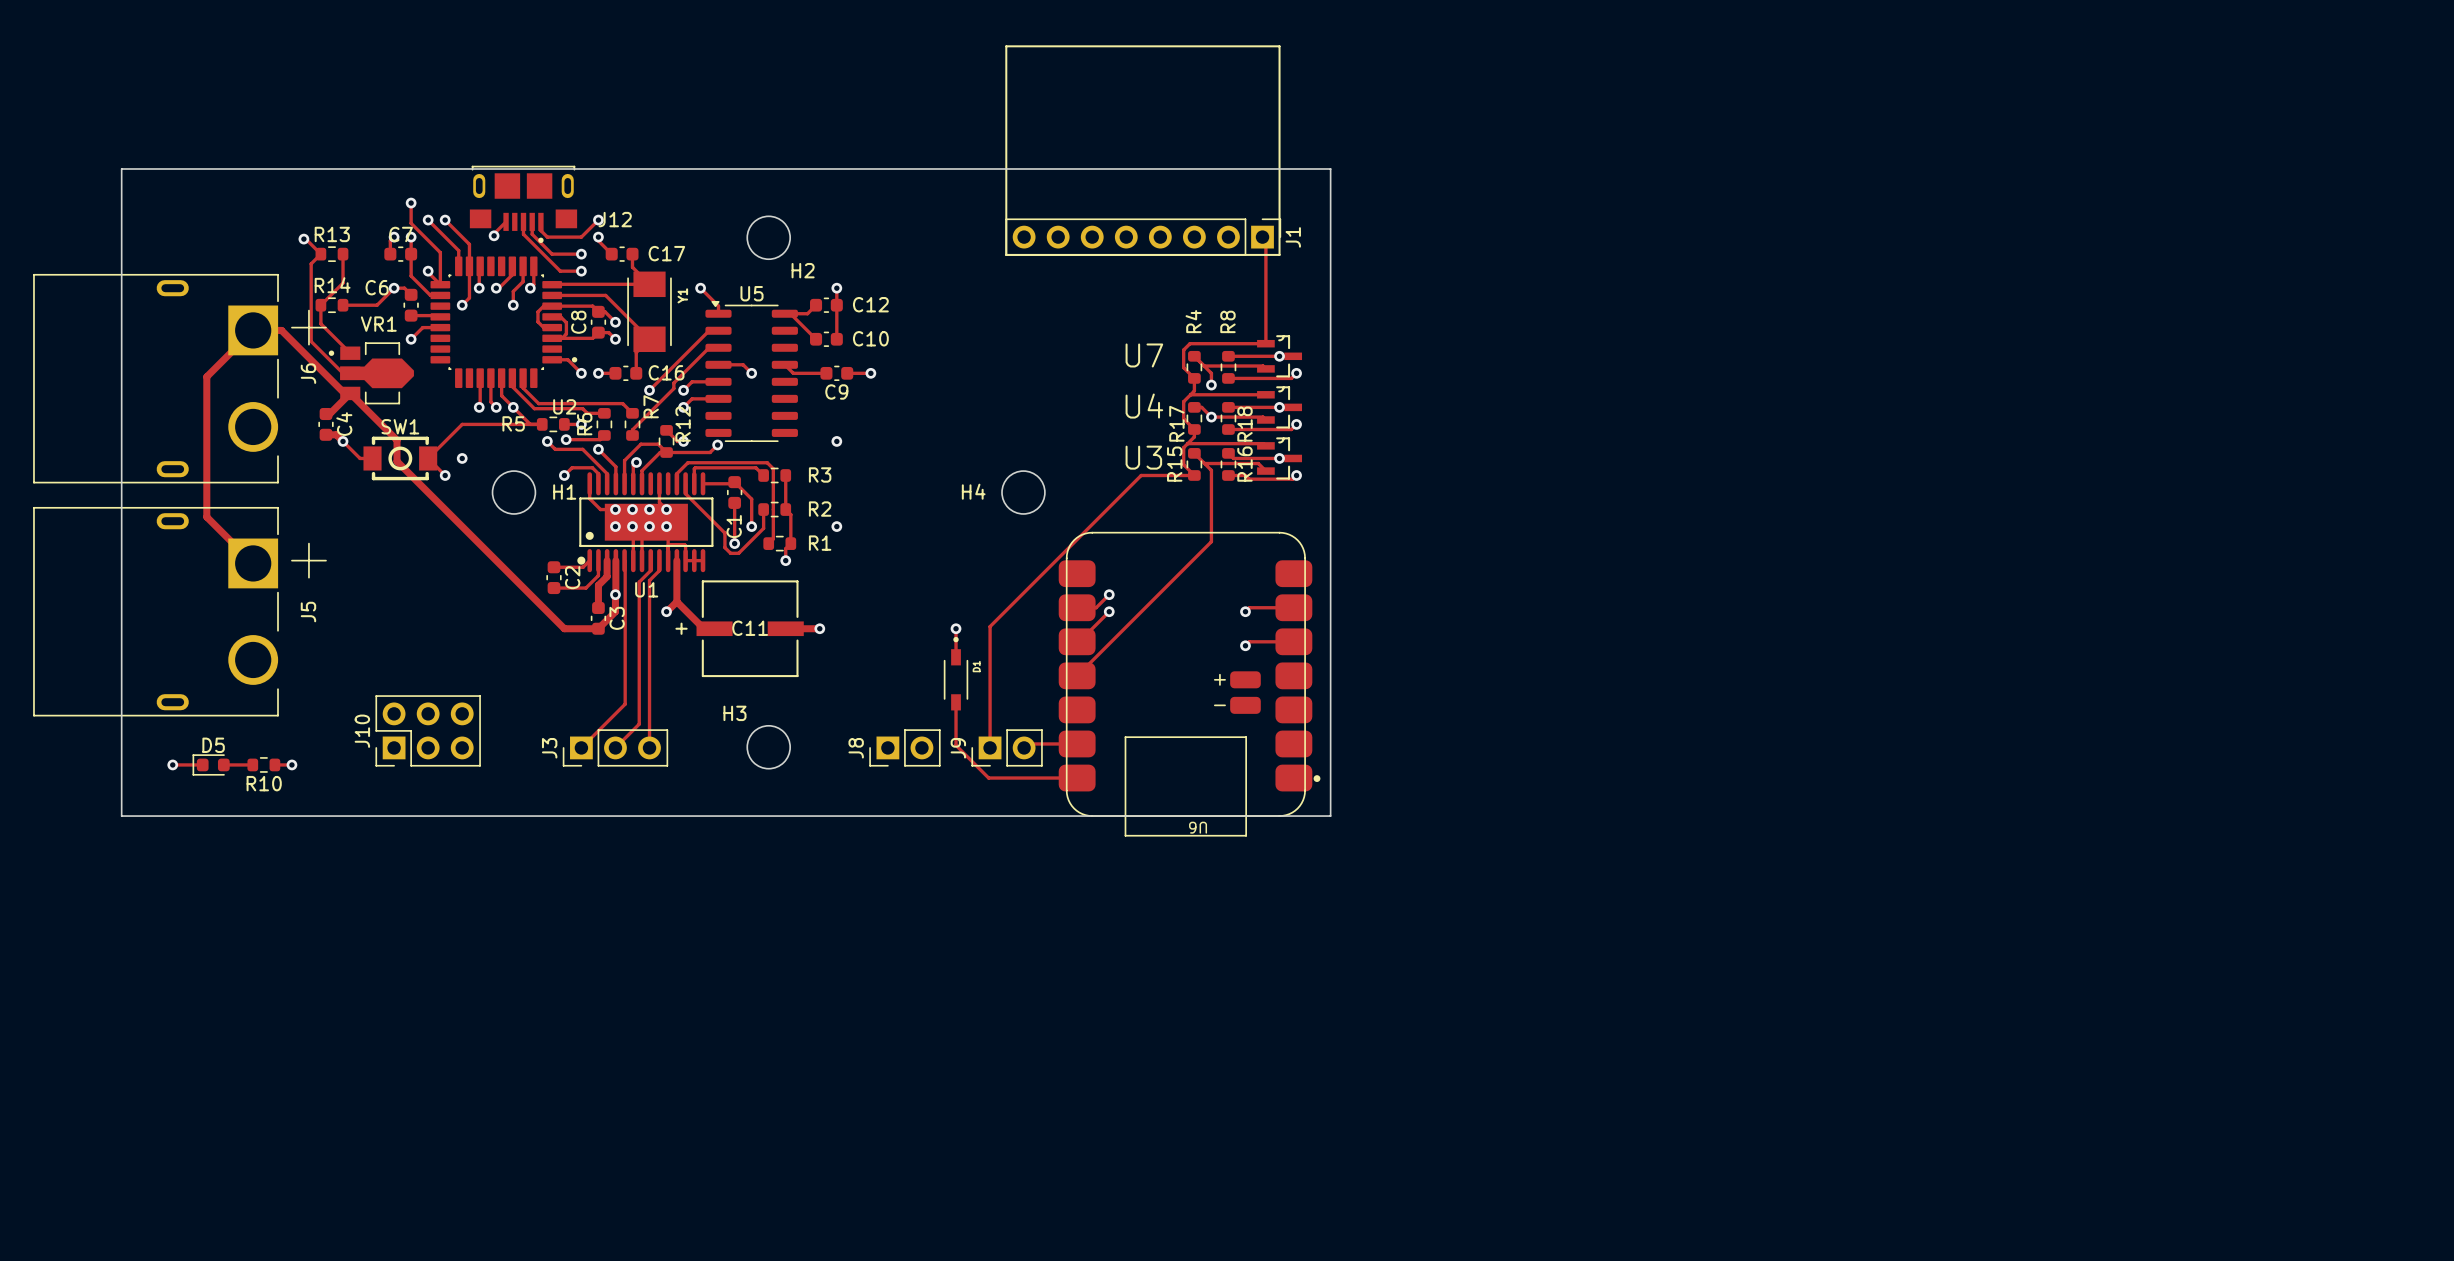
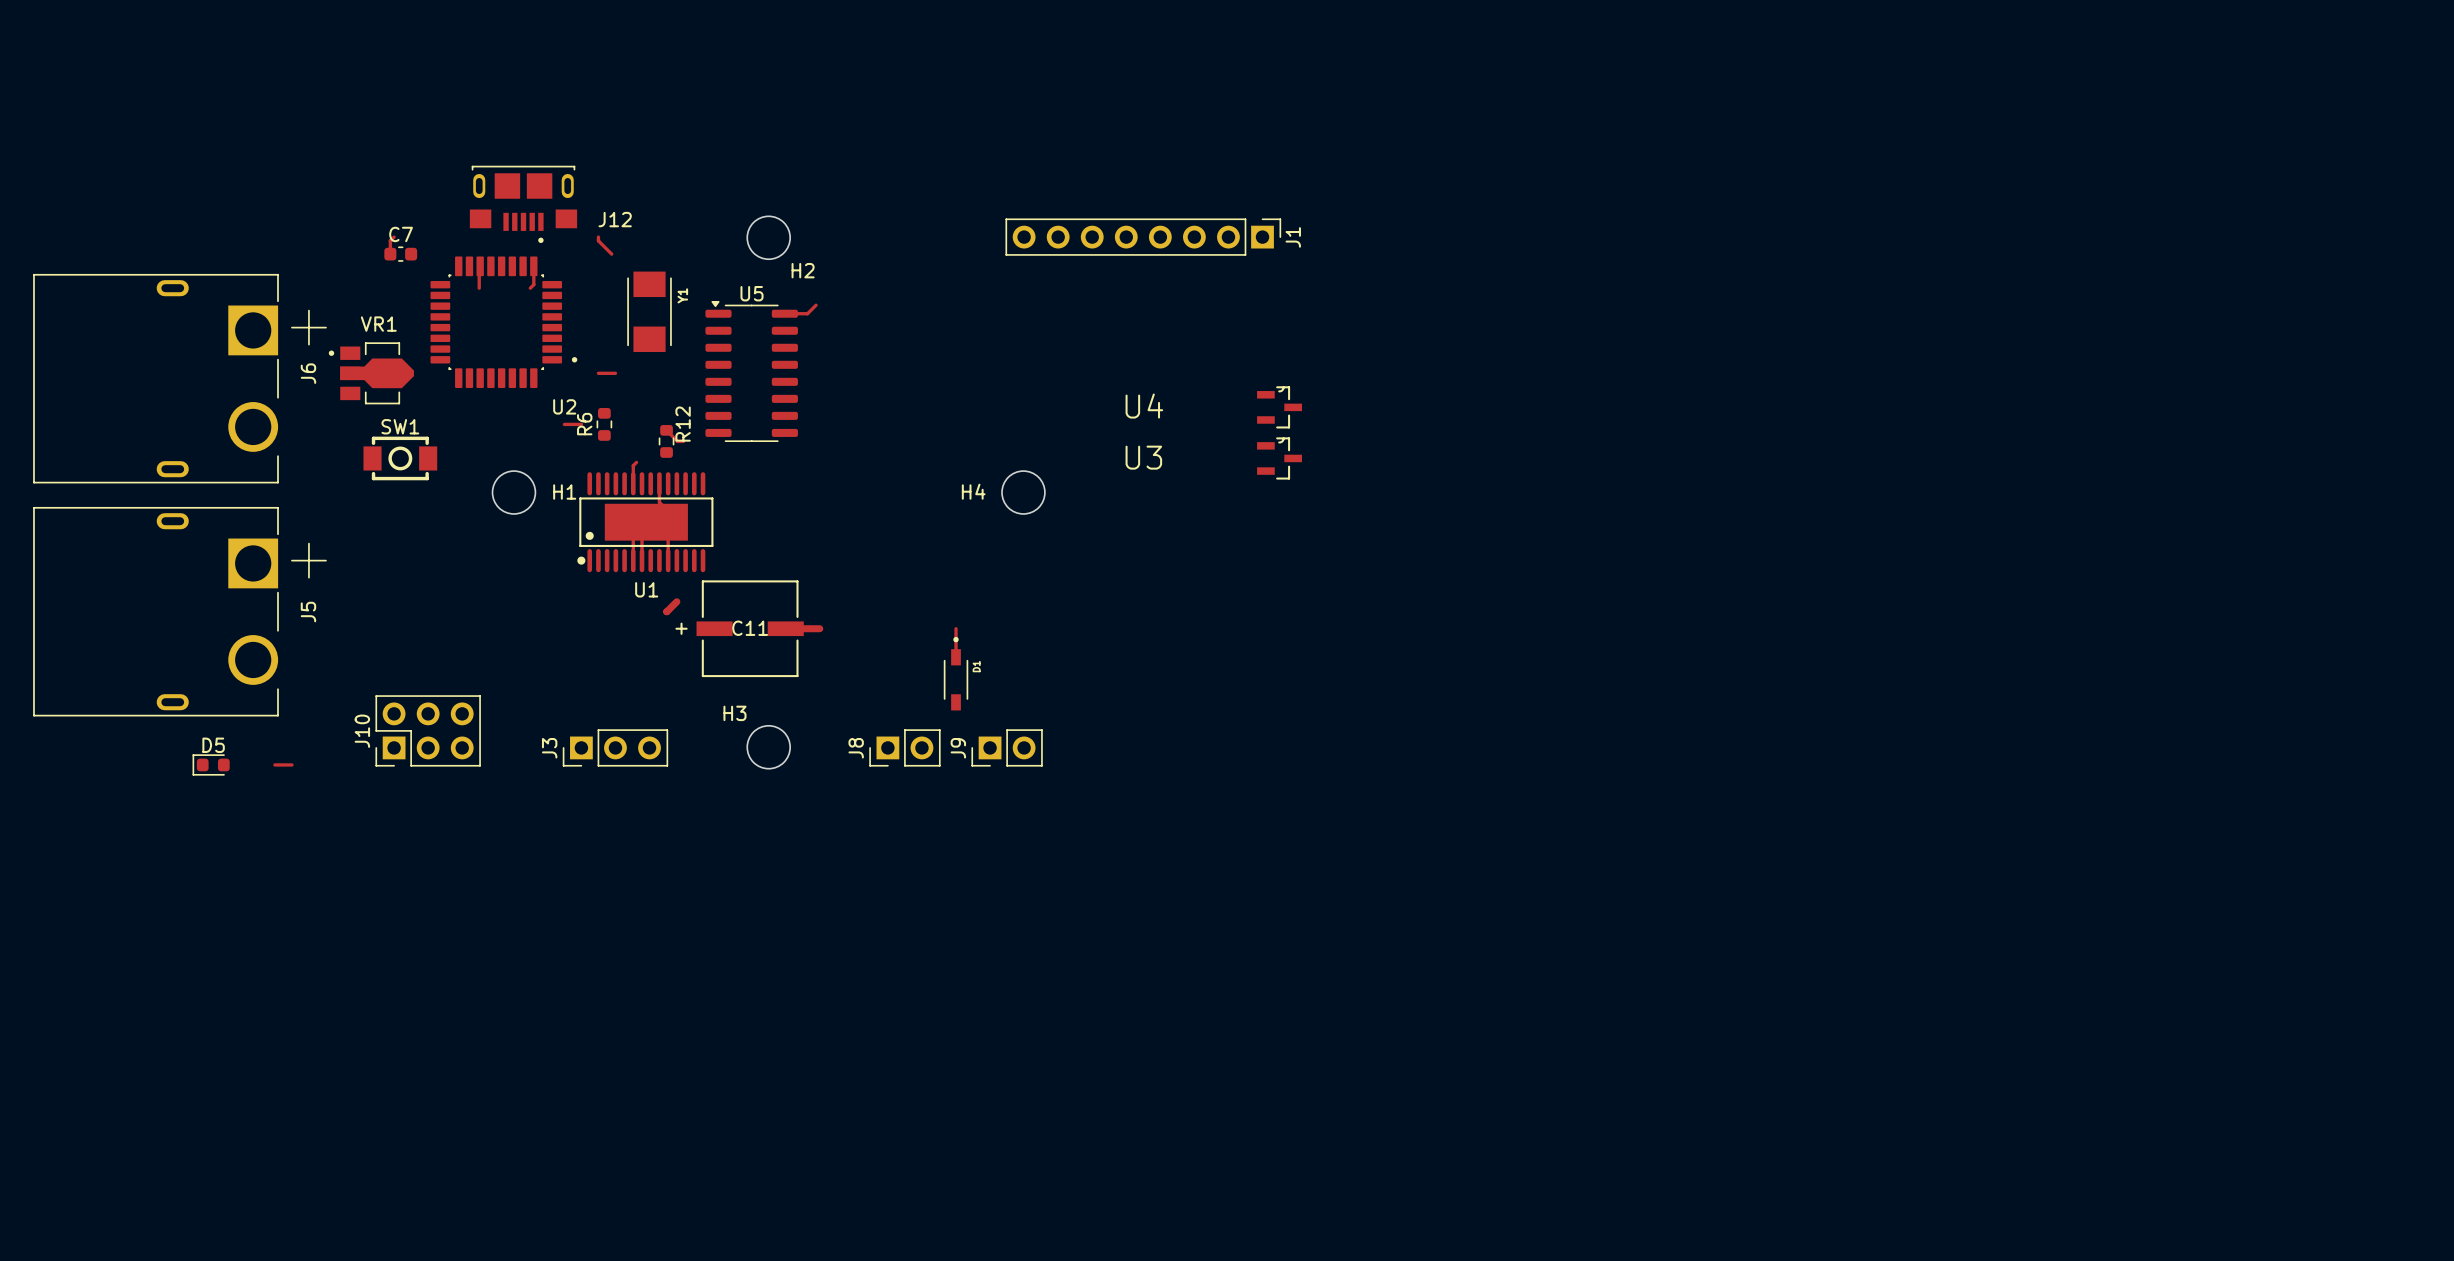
line: (1006, 46) (1279, 46) (1279, 254) (1006, 254) (1006, 46) -> none
board edge: (121, 168) (1330, 168) (1330, 816) (121, 816) (121, 168) -> none
track: (411, 203) (411, 223) (440, 252) (440, 284) (428, 271) -> none
via: (411, 203) -> none
track: (428, 220) (458, 250) (458, 266) -> none
via: (428, 220) -> none
track: (445, 220) (469, 244) (469, 297) (462, 305) -> none
via: (445, 220) -> none
track: (598, 220) (581, 237) (547, 237) (540, 230) (540, 221) -> none
via: (598, 220) -> none
track: (506, 221) (494, 235) -> none
track: (523, 221) (523, 234) (560, 271) (581, 271) -> none
track: (532, 221) (532, 234) (552, 254) (581, 254) -> none
via: (494, 235) -> none
via: (394, 237) -> none
track: (411, 237) (411, 276) (430, 295) (440, 295) -> none
via: (411, 237) -> none
via: (598, 237) -> none
track: (1262, 237) (1265, 240) (1265, 343) (1189, 343) (1183, 349) (1183, 367) (1194, 378) (1194, 390) (1183, 401) (1183, 418) (1194, 429) (1194, 436) (1183, 447) (1183, 464) (1194, 475) (1141, 475) (990, 626) (990, 747) -> none
track: (303, 239) (320, 254) (311, 263) (311, 341) (343, 373) (350, 373) -> none
via: (303, 239) -> none
R13: (331, 254) -> none
track: (343, 254) (343, 283) (320, 305) (320, 323) (350, 353) -> none
via: (581, 254) -> none
C17: (622, 254) -> none
track: (632, 254) (632, 267) (649, 284) (552, 284) -> none
track: (512, 266) (512, 274) (498, 288) (496, 288) -> none
track: (523, 266) (523, 281) (513, 291) (513, 305) -> none
via: (428, 271) -> none
via: (581, 271) -> none
via: (394, 288) -> none
via: (479, 288) -> none
via: (496, 288) -> none
via: (530, 288) -> none
track: (700, 288) (718, 306) (718, 313) -> none
via: (700, 288) -> none
track: (836, 288) (836, 339) -> none
via: (836, 288) -> none
track: (411, 294) (404, 288) (394, 288) (377, 305) (343, 305) -> none
track: (552, 295) (605, 295) (649, 339) (636, 352) (636, 373) -> none
R14: (331, 305) -> none
C6: (411, 305) -> none
via: (462, 305) -> none
via: (513, 305) -> none
C12: (826, 305) -> none
track: (790, 313) (816, 339) -> none
track: (411, 315) (440, 316) -> none
track: (552, 316) (560, 316) (566, 322) (566, 333) (562, 338) -> none
C8: (598, 322) -> none
track: (615, 322) (605, 311) (598, 311) (592, 306) (543, 306) (537, 311) (537, 321) (543, 327) (552, 327) -> none
via: (615, 322) -> none
track: (440, 327) (422, 327) (411, 339) -> none
track: (718, 330) (709, 330) (649, 390) -> none
track: (552, 338) (592, 338) (598, 332) (608, 332) (615, 339) -> none
via: (411, 339) -> none
via: (615, 339) -> none
C10: (826, 339) -> none
track: (718, 347) (709, 347) (673, 383) (673, 388) (632, 429) (632, 435) -> none
track: (1194, 356) (1211, 373) (1211, 385) -> none
track: (1228, 356) (1293, 356) -> none
U7: (1279, 356) -> none
via: (1279, 356) -> none
track: (552, 359) (567, 359) (581, 373) -> none
track: (718, 364) (743, 364) (751, 373) -> none
track: (784, 364) (793, 373) (826, 373) -> none
track: (1204, 366) (1263, 366) (1265, 368) -> none
R4: (1194, 367) -> none
R8: (1228, 367) -> none
via: (581, 373) -> none
via: (598, 373) -> none
C16: (625, 373) -> none
via: (751, 373) -> none
C9: (836, 373) -> none
track: (847, 373) (870, 373) -> none
via: (870, 373) -> none
track: (1296, 373) (1291, 378) (1228, 378) -> none
via: (1296, 373) -> none
track: (480, 378) (479, 407) -> none
track: (490, 378) (490, 402) (496, 407) -> none
track: (501, 378) (501, 395) (530, 424) -> none
track: (512, 378) (512, 386) (534, 408) (582, 408) (587, 413) (604, 413) -> none
track: (523, 378) (523, 388) (538, 403) (622, 403) (632, 413) -> none
track: (718, 381) (692, 381) (683, 390) -> none
via: (1211, 385) -> none
via: (649, 390) -> none
via: (683, 390) -> none
track: (345, 394) (281, 330) (253, 330) (206, 376) (206, 517) (253, 563) -> none
track: (1190, 394) (1265, 394) -> none
track: (718, 398) (692, 398) (683, 407) -> none
via: (479, 407) -> none
via: (496, 407) -> none
via: (513, 407) -> none
via: (683, 407) -> none
track: (1194, 407) (1201, 407) (1211, 417) (1263, 417) (1265, 419) -> none
track: (1228, 407) (1293, 407) -> none
via: (1279, 407) -> none
track: (325, 414) (329, 414) (350, 393) (397, 440) (397, 461) (564, 628) (598, 628) (615, 611) (615, 560) -> none
via: (1211, 417) -> none
R17: (1194, 418) -> none
R18: (1228, 418) -> none
C4: (325, 424) -> none
track: (542, 424) (462, 424) (428, 458) (445, 475) -> none
R5: (553, 424) -> none
via: (581, 424) -> none
R7: (632, 424) -> none
track: (1296, 424) (1291, 429) (1228, 429) -> none
via: (1296, 424) -> none
track: (325, 434) (336, 434) (360, 458) (372, 458) -> none
track: (604, 435) (600, 439) (566, 439) -> none
via: (566, 439) -> none
via: (343, 441) -> none
track: (547, 441) (555, 449) (582, 449) (607, 473) (607, 483) -> none
via: (547, 441) -> none
via: (683, 441) -> none
via: (836, 441) -> none
track: (1187, 443) (1263, 443) (1265, 445) -> none
track: (717, 444) (710, 452) (660, 452) (642, 470) (642, 483) -> none
via: (717, 444) -> none
track: (598, 449) (615, 466) (615, 483) -> none
via: (598, 449) -> none
track: (666, 452) (658, 444) (640, 444) (624, 460) (624, 483) -> none
track: (1194, 453) (1211, 470) (1211, 541) (1077, 675) -> none
track: (1228, 453) (1233, 458) (1293, 458) -> none
via: (462, 458) -> none
via: (1279, 458) -> none
via: (636, 462) -> none
track: (1204, 463) (1258, 463) (1265, 471) -> none
R15: (1194, 464) -> none
R16: (1228, 464) -> none
via: (445, 475) -> none
track: (564, 475) (572, 467) (592, 467) (598, 473) (598, 483) -> none
via: (564, 475) -> none
track: (763, 475) (755, 467) (695, 467) (694, 483) -> none
R3: (774, 475) -> none
track: (785, 475) (785, 509) (790, 514) (790, 543) (785, 548) (785, 560) -> none
track: (1228, 475) (1245, 475) (1249, 479) (1292, 479) (1296, 475) -> none
via: (1296, 475) -> none
track: (589, 483) (589, 498) (600, 509) (615, 509) -> none
track: (676, 483) (676, 473) (687, 462) (767, 462) (773, 468) (773, 538) (768, 543) -> none
track: (685, 483) (685, 493) (724, 533) (724, 547) (730, 553) (738, 553) (763, 528) (763, 509) -> none
track: (703, 483) (733, 483) (734, 482) (751, 499) (751, 526) -> none
C1: (734, 492) -> none
track: (734, 502) (734, 543) -> none
via: (615, 509) -> none
via: (632, 509) -> none
via: (649, 509) -> none
via: (666, 509) -> none
R2: (774, 509) -> none
via: (615, 526) -> none
via: (632, 526) -> none
via: (649, 526) -> none
via: (666, 526) -> none
via: (751, 526) -> none
via: (836, 526) -> none
via: (734, 543) -> none
R1: (779, 543) -> none
track: (668, 545) (684, 544) (685, 560) (703, 560) -> none
track: (589, 560) (583, 567) (553, 567) -> none
track: (598, 560) (598, 575) (585, 588) (553, 588) -> none
track: (607, 560) (607, 576) (598, 585) (598, 607) -> none
track: (624, 560) (625, 704) (581, 747) -> none
track: (650, 560) (650, 570) (639, 582) (639, 724) (615, 747) -> none
track: (659, 560) (659, 570) (649, 580) (649, 747) -> none
track: (676, 560) (676, 601) (703, 628) (714, 628) -> none
via: (785, 560) -> none
C2: (553, 577) -> none
via: (615, 594) -> none
track: (1109, 594) (1096, 607) (1077, 607) -> none
via: (1109, 594) -> none
track: (1293, 607) (1249, 607) (1245, 611) -> none
via: (666, 611) -> none
track: (1109, 611) (1077, 641) -> none
via: (1109, 611) -> none
via: (1245, 611) -> none
C3: (598, 618) -> none
via: (819, 628) -> none
via: (956, 628) -> none
track: (1293, 641) (1249, 641) (1245, 645) -> none
via: (1245, 645) -> none
U6: (1189, 684) -> none
track: (956, 702) (956, 745) (988, 778) (1077, 778) -> none
track: (1077, 743) (1028, 743) (1024, 747) -> none
track: (172, 764) (202, 764) -> none
via: (172, 764) -> none
track: (223, 764) (252, 764) -> none
R10: (263, 764) -> none
via: (291, 764) -> none

